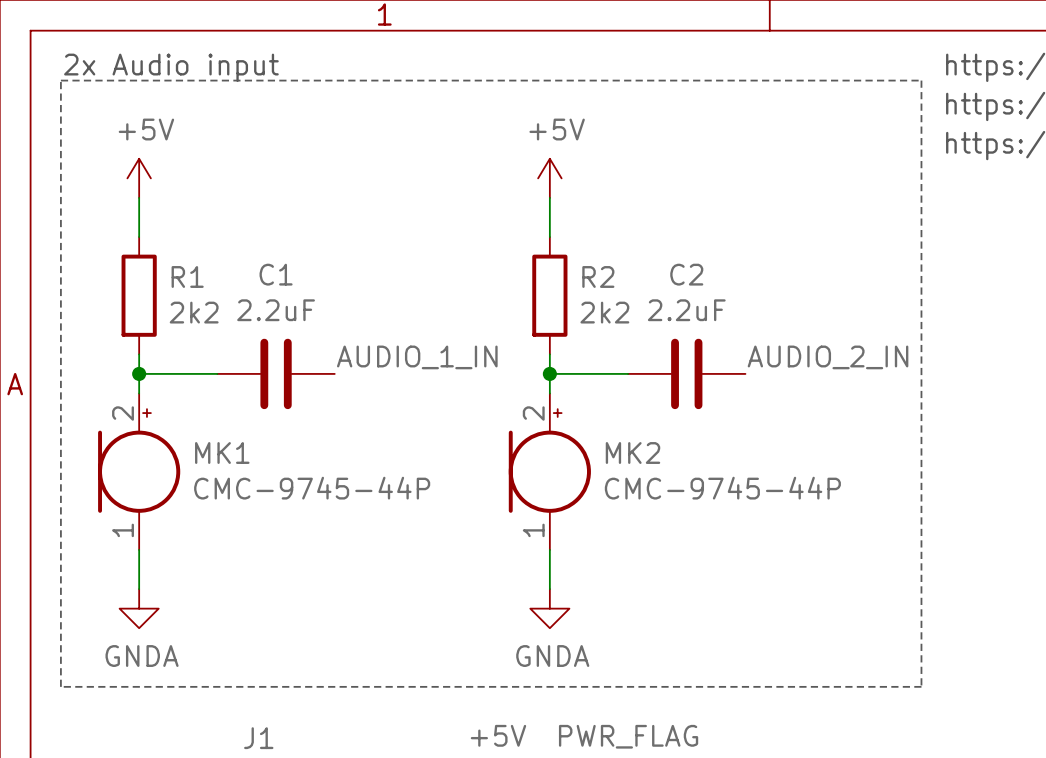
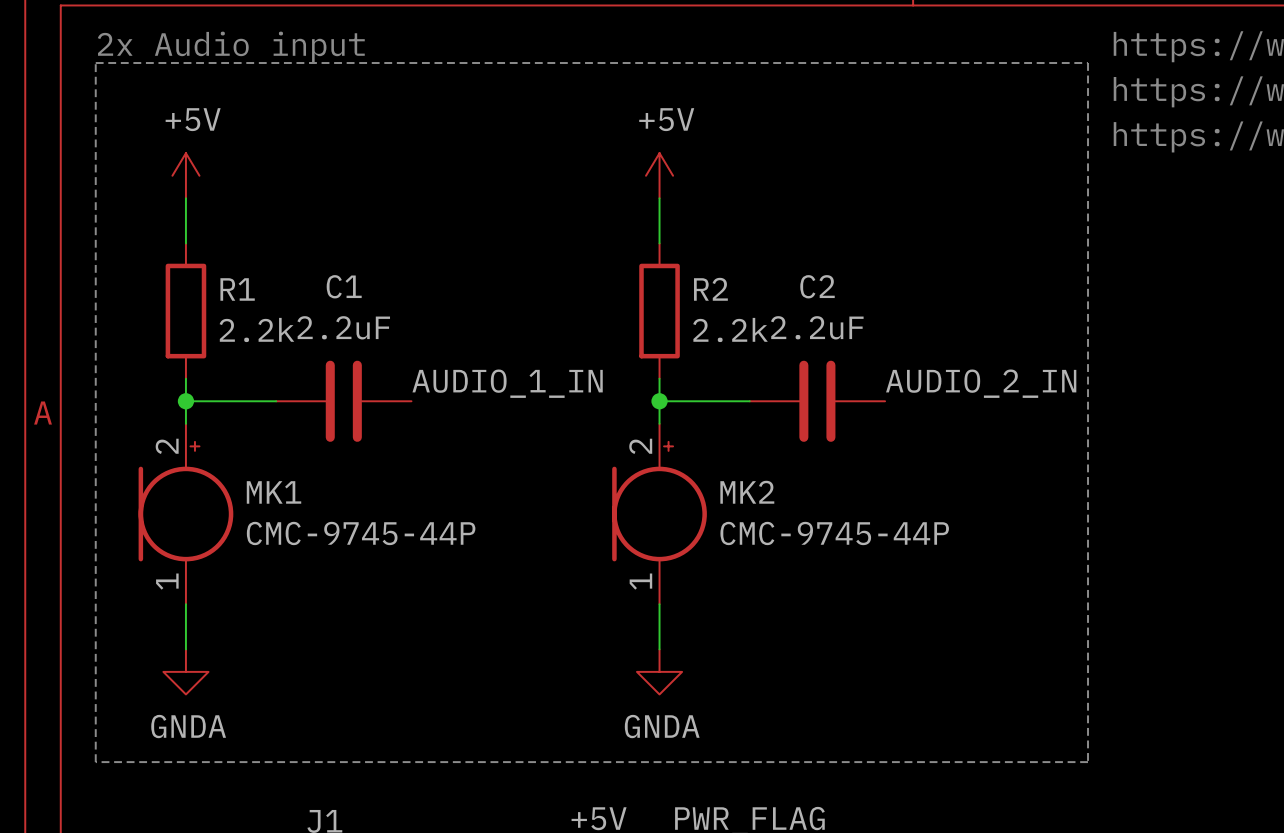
R1 value: 2k2 (194, 312) -> 2.2k (256, 329)
R2 value: 2k2 (604, 312) -> 2.2k (730, 329)

